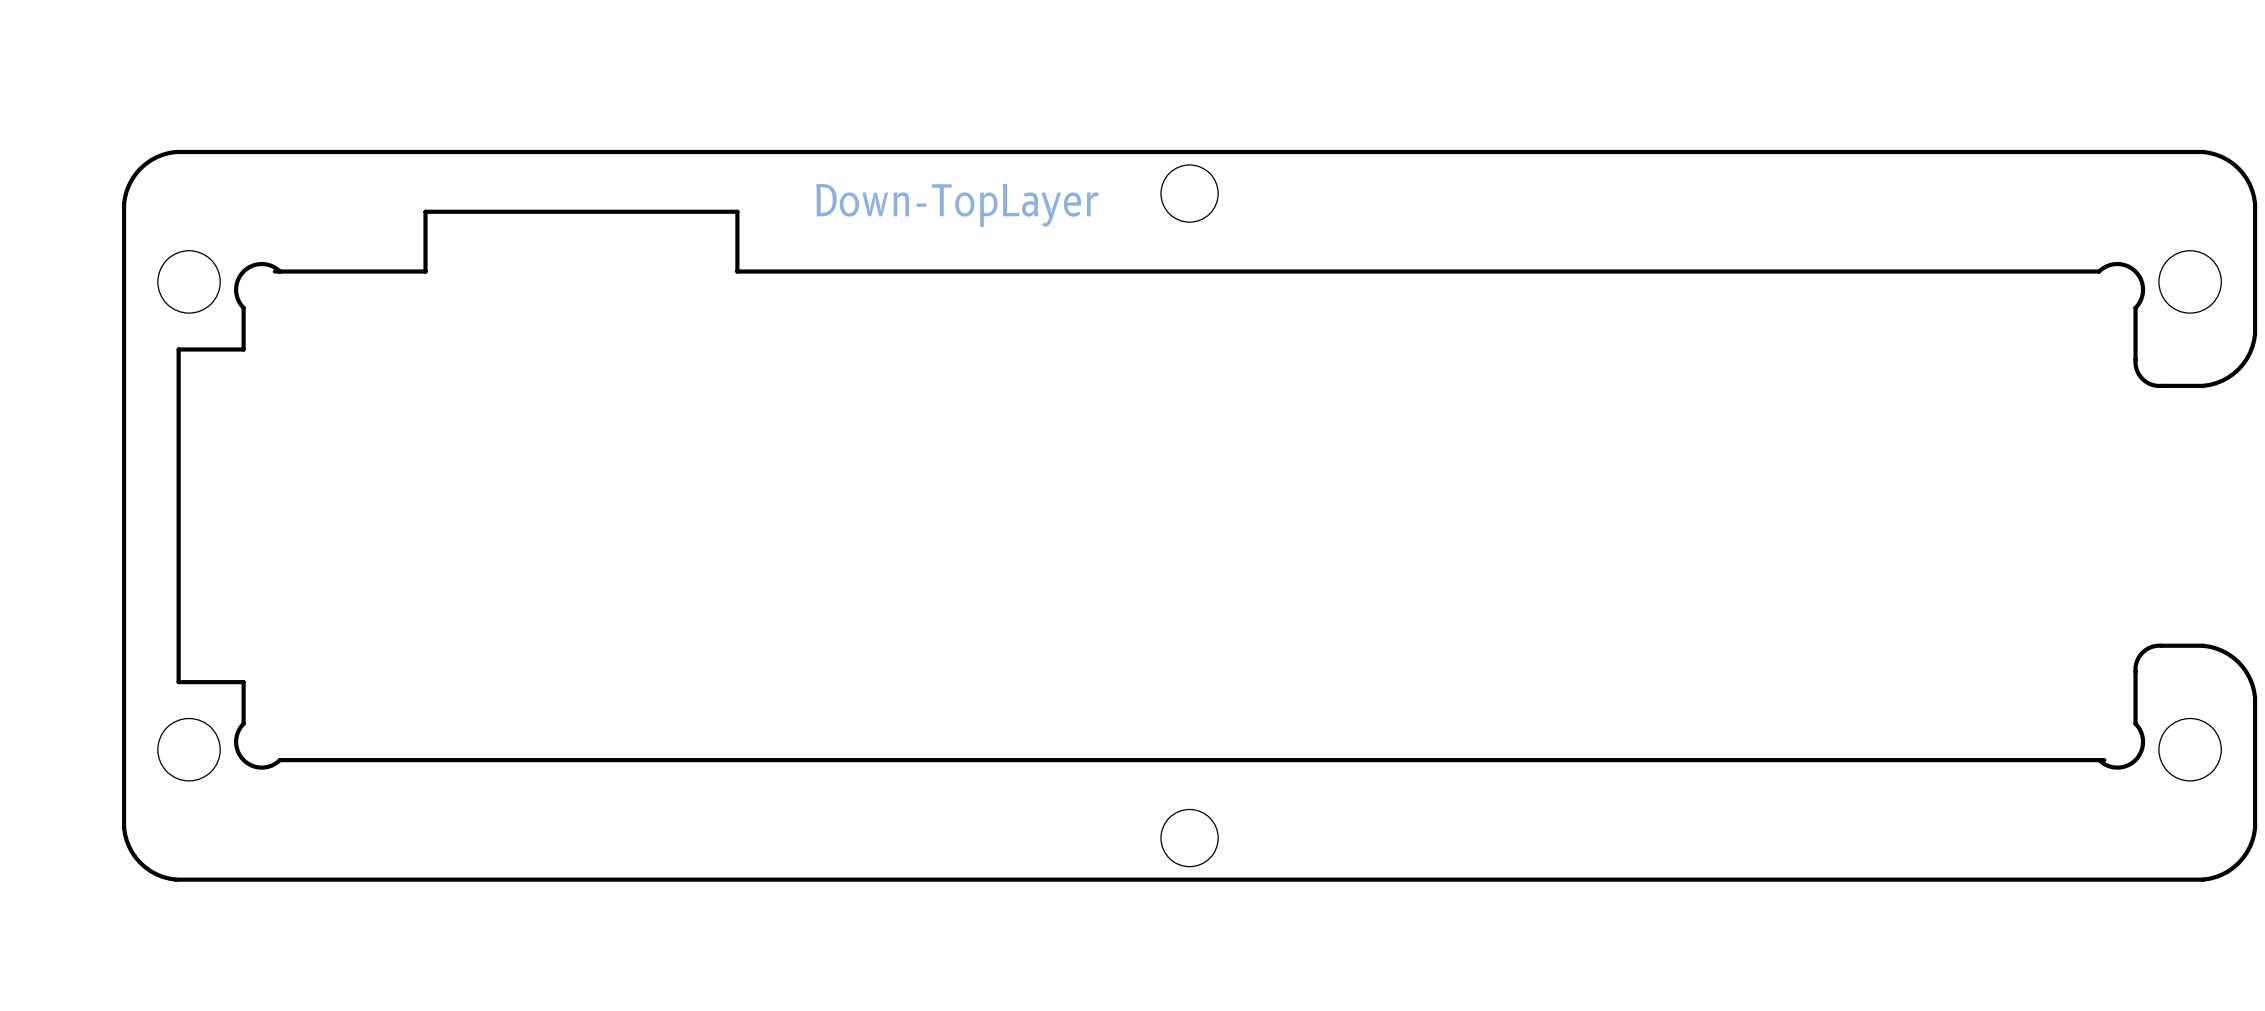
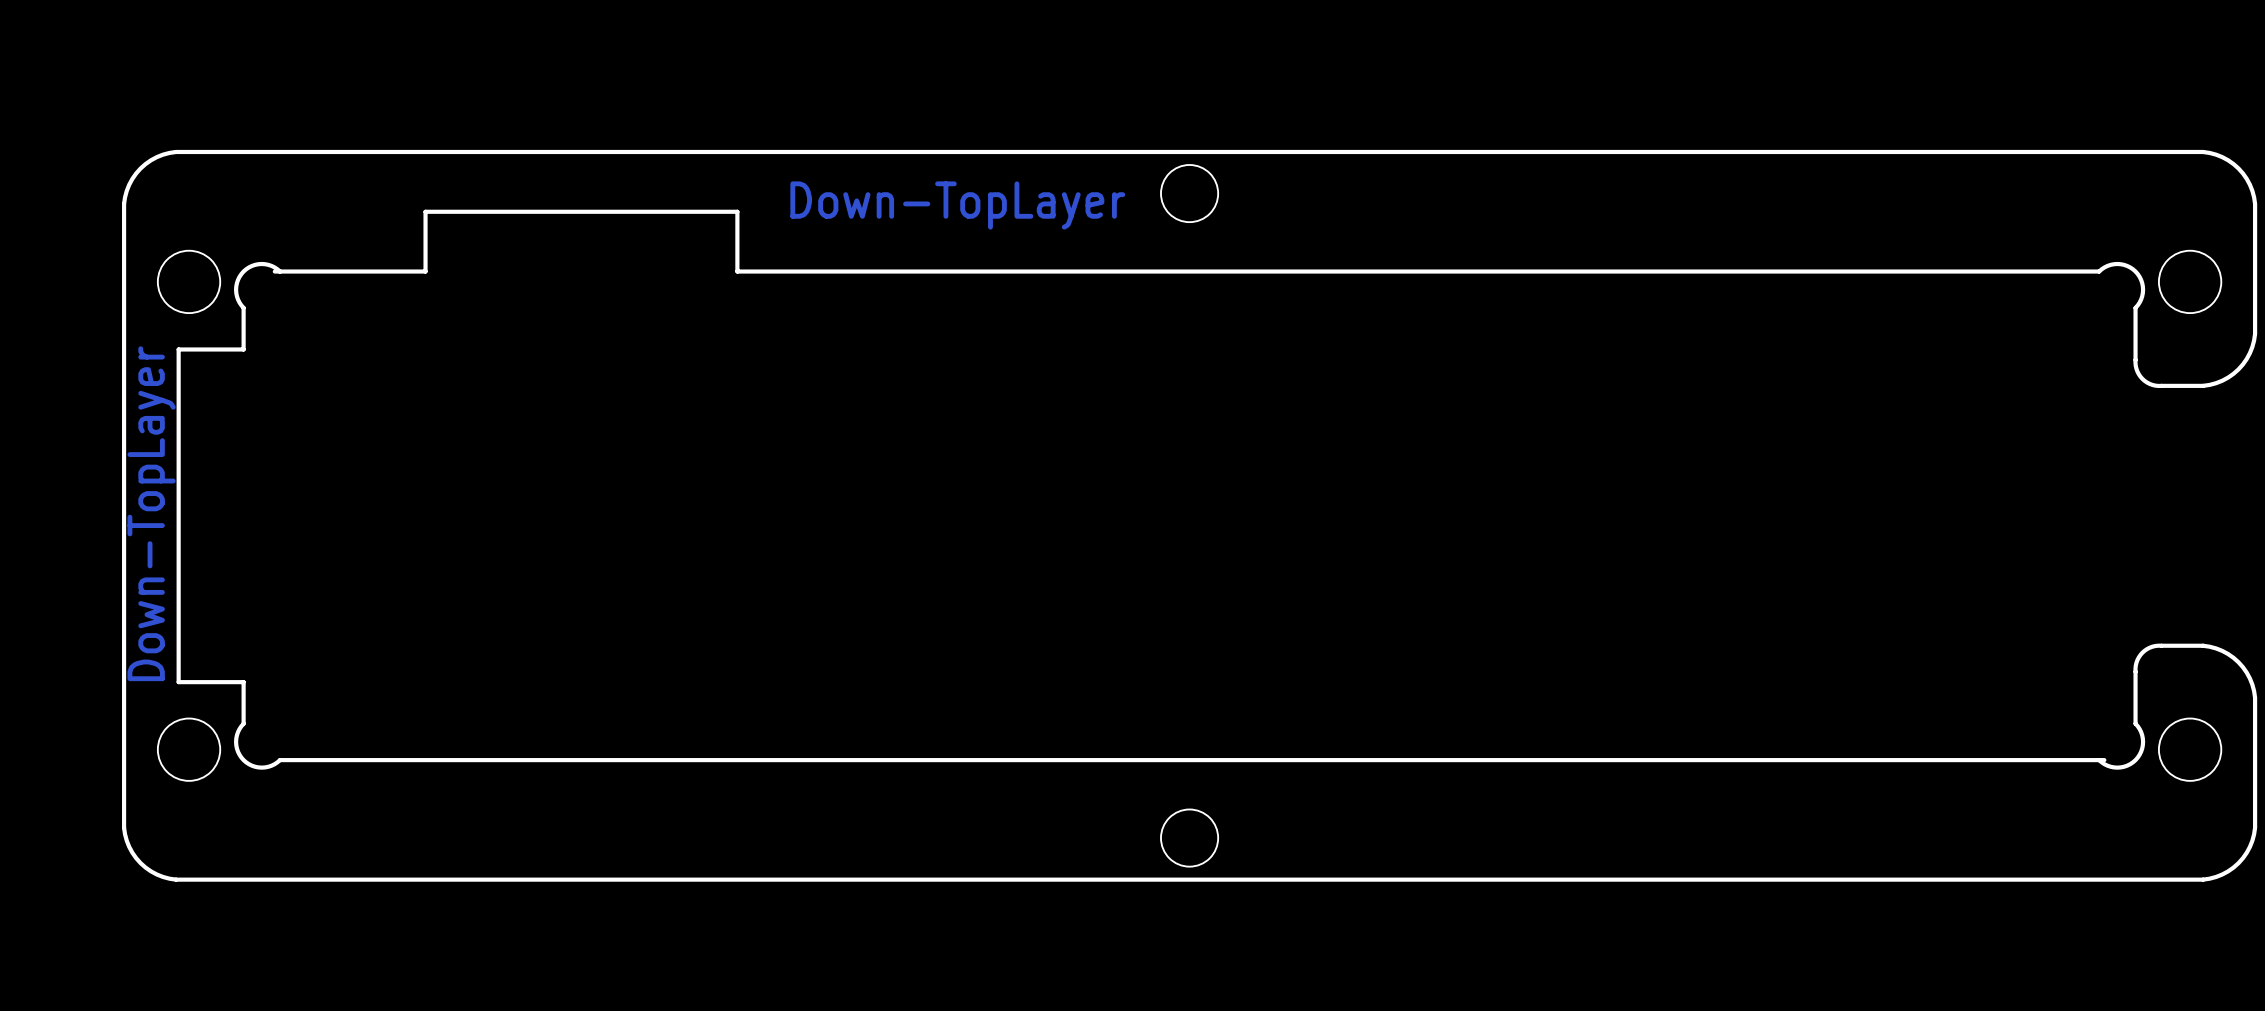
text: none -> Down-TopLayer (151, 513)

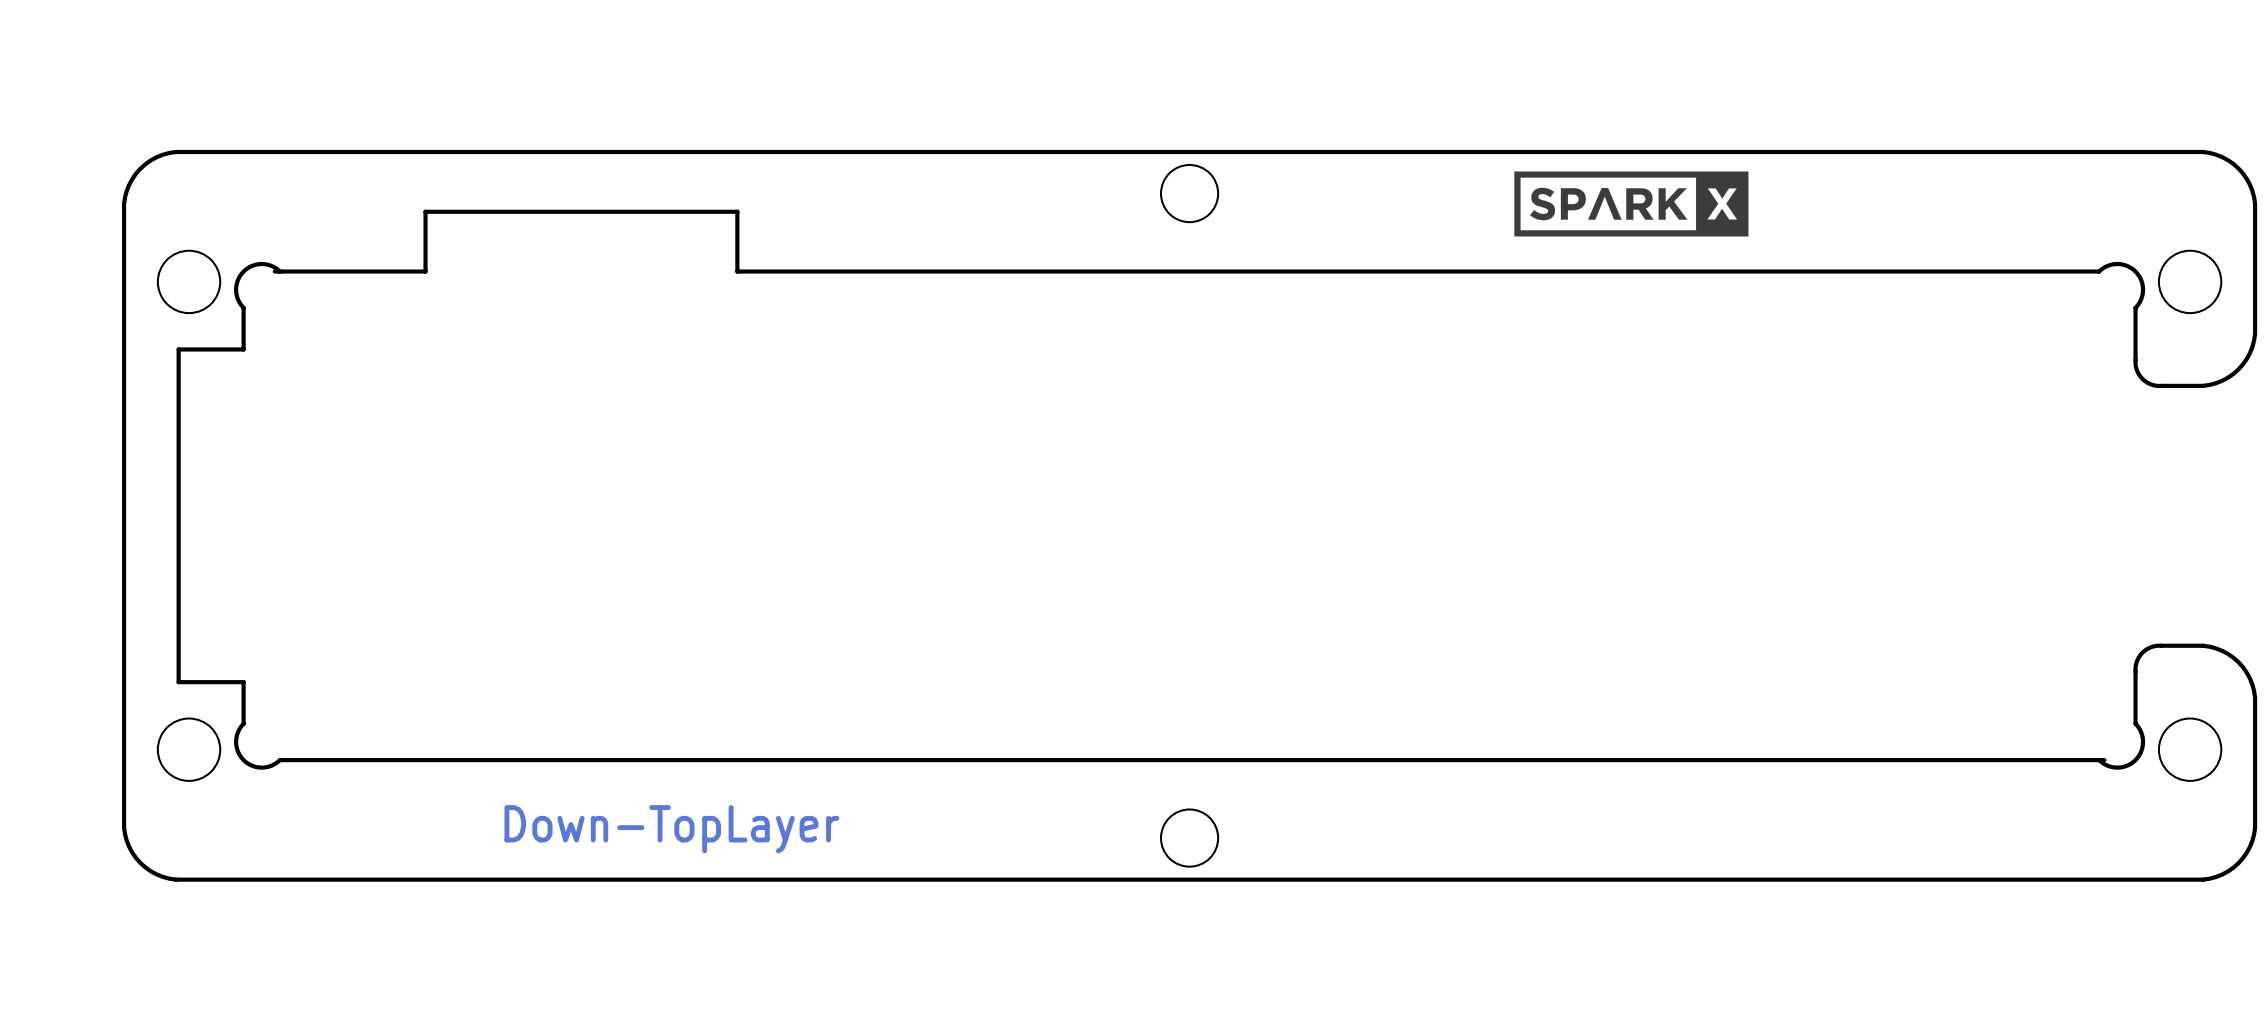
drawing: none -> [1514, 171, 1749, 237]
text: Down-TopLayer (957, 205) -> none
text: Down-TopLayer (151, 513) -> none
text: none -> Down-TopLayer (671, 829)

